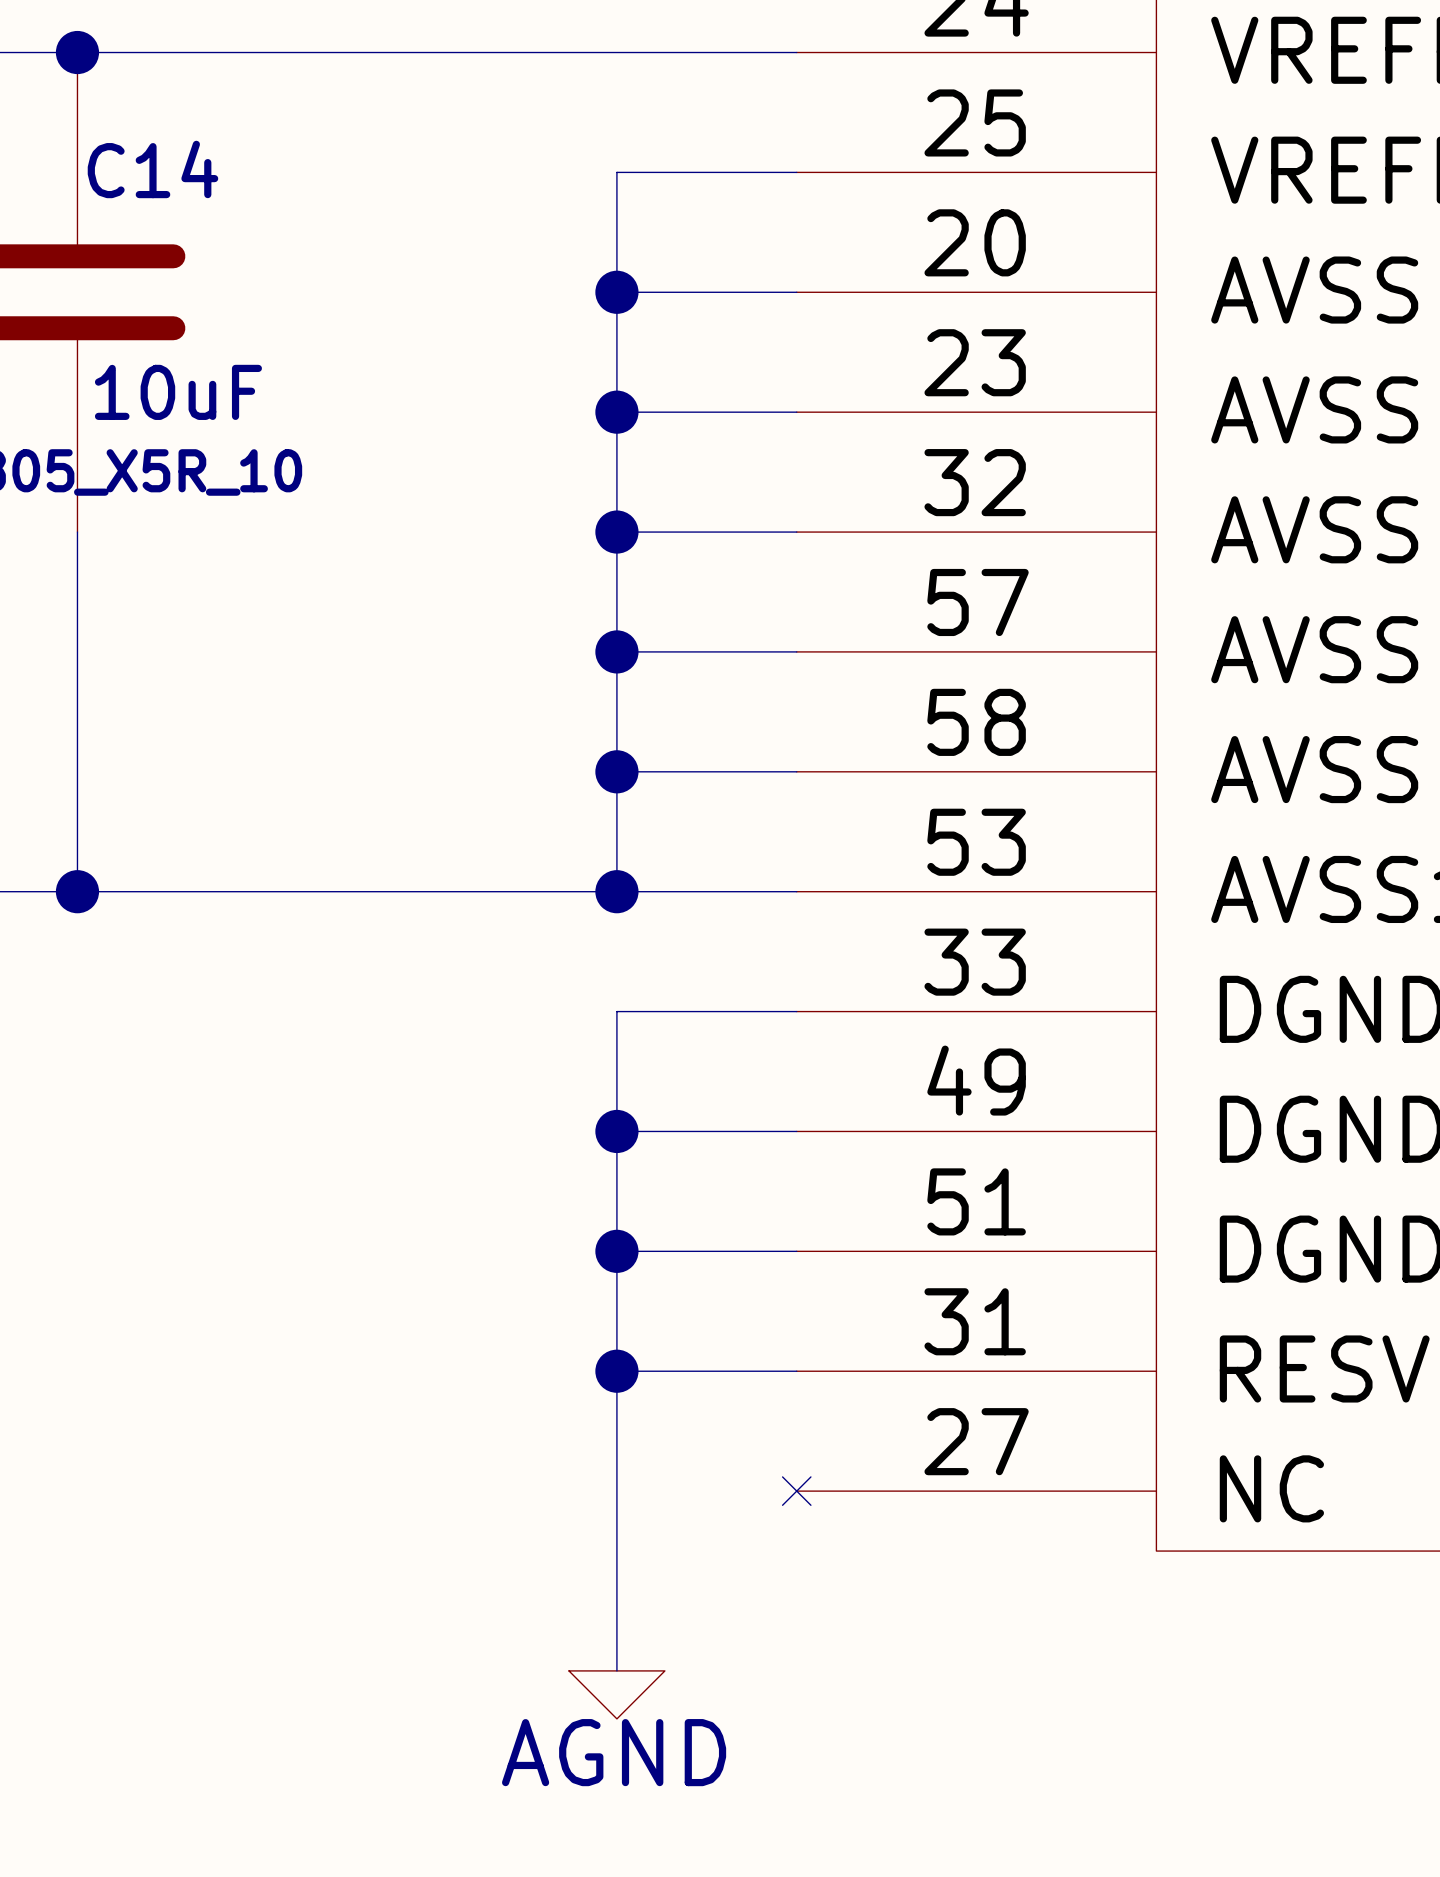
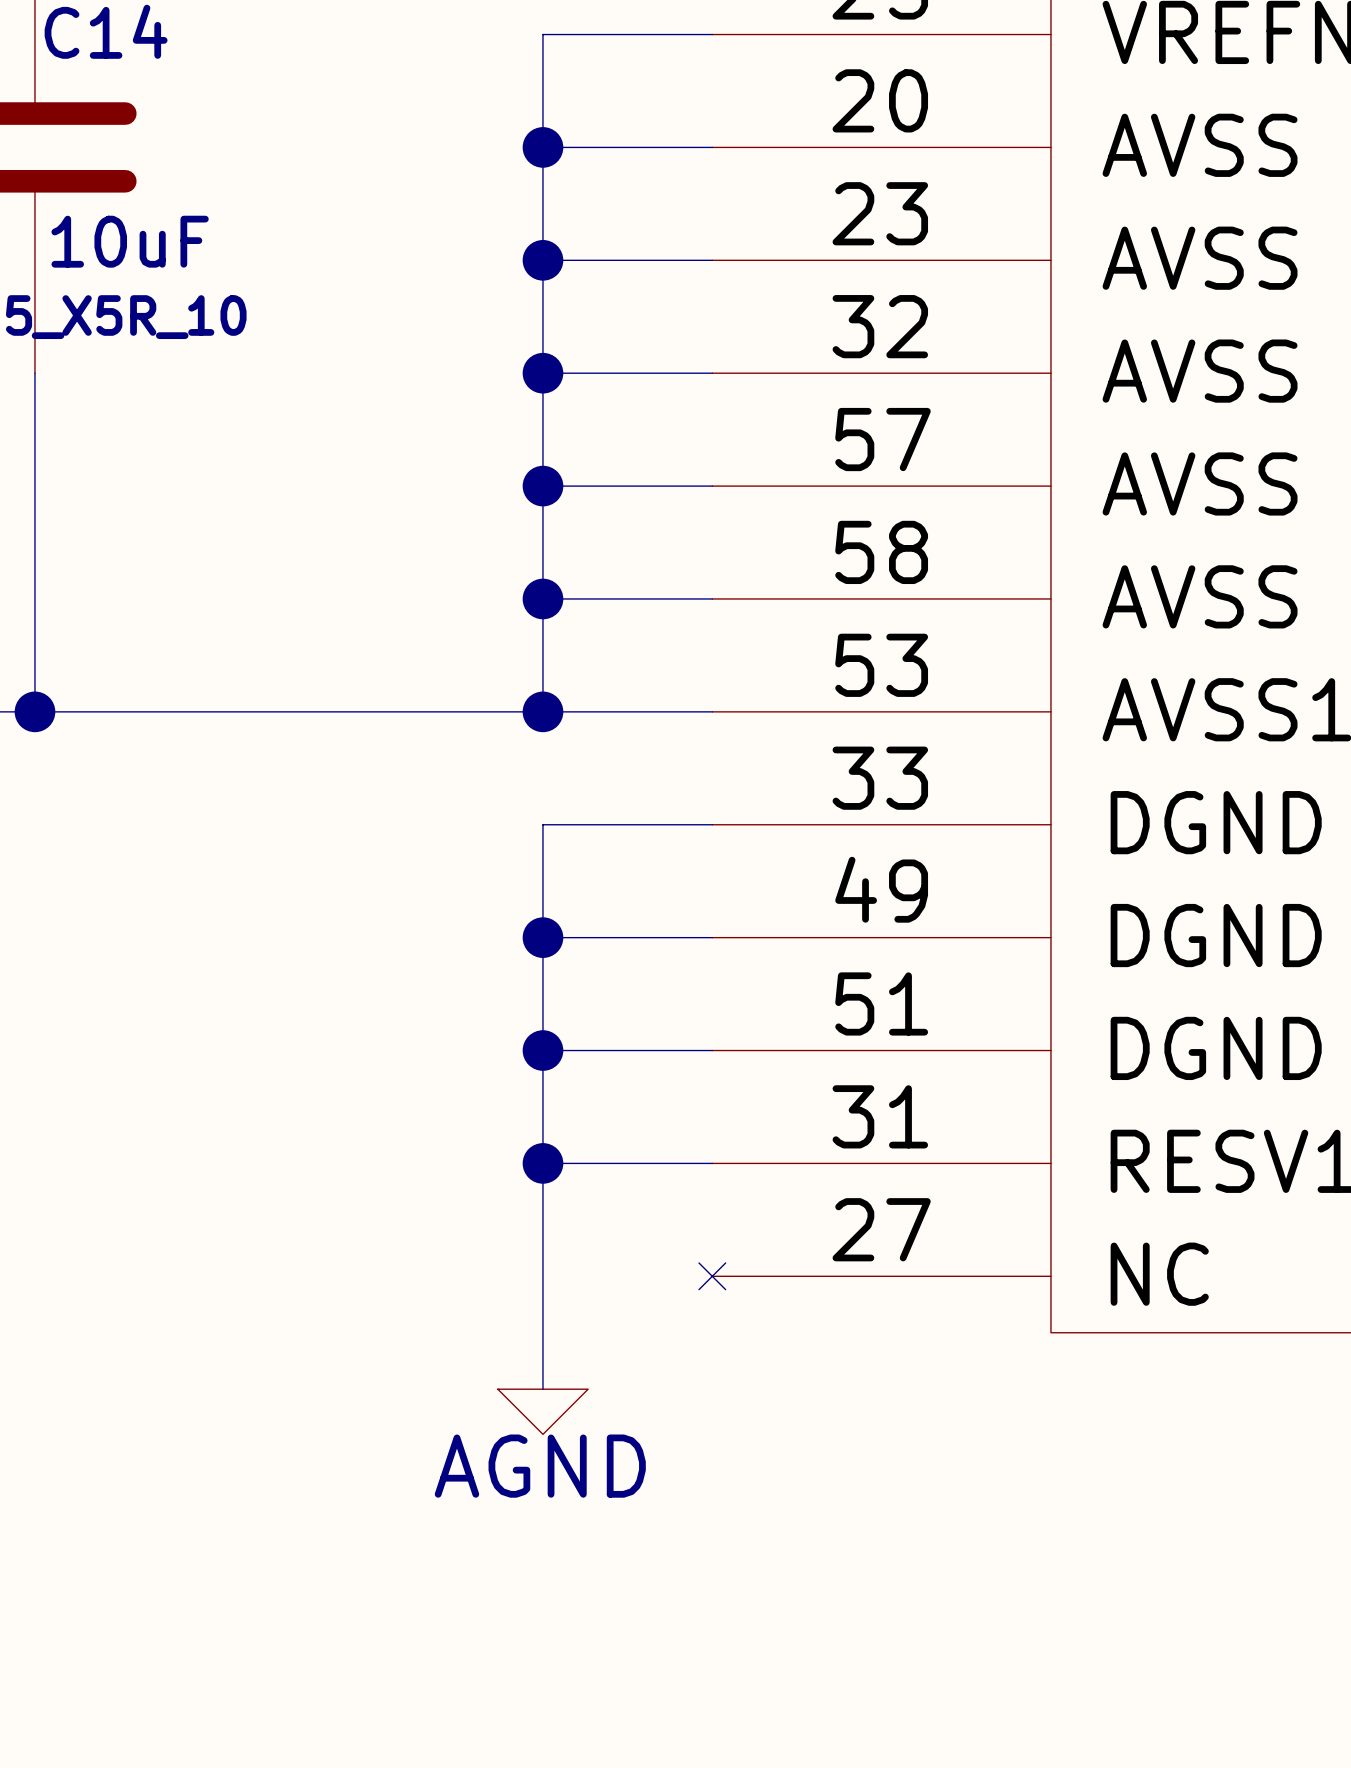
wire: (616, 1610) (616, 1670) -> none
power symbol position: AGND (616, 1694) -> AGND (542, 1411)

